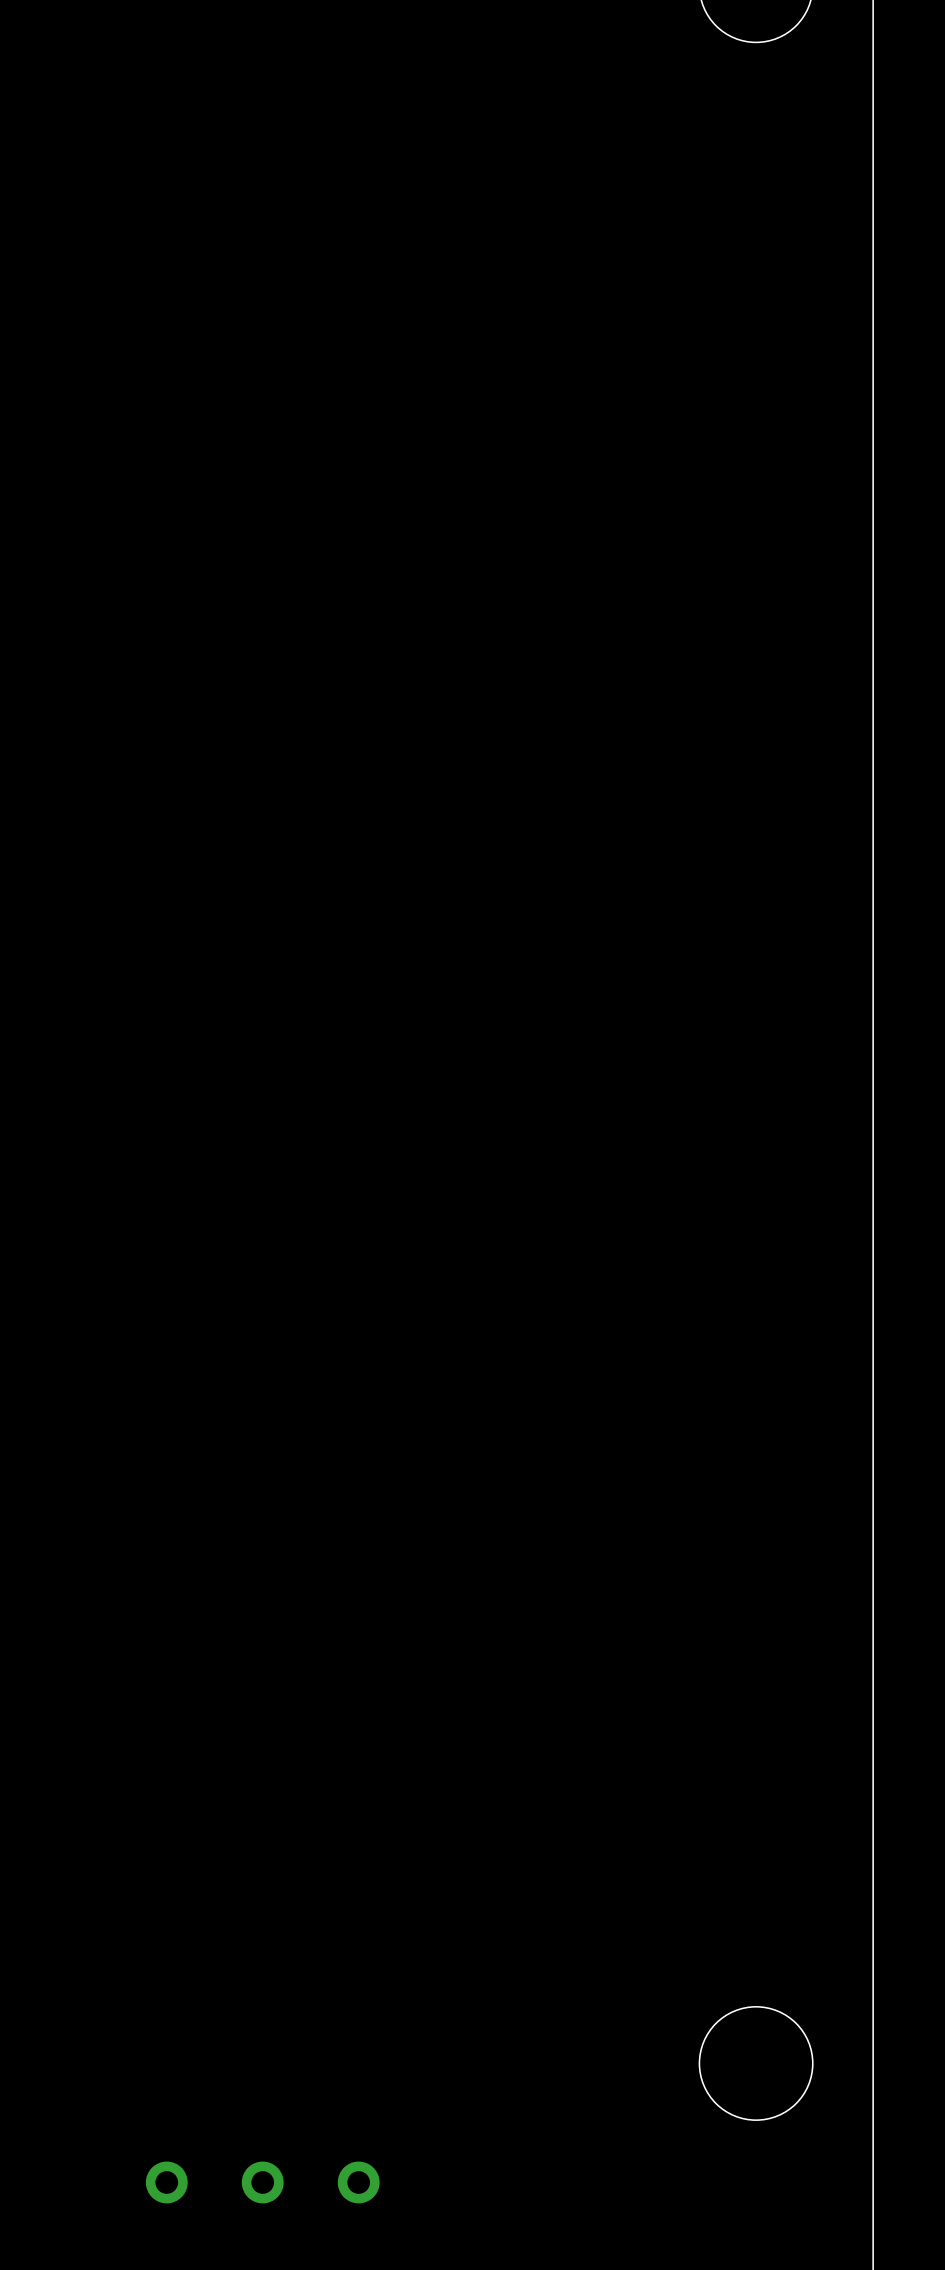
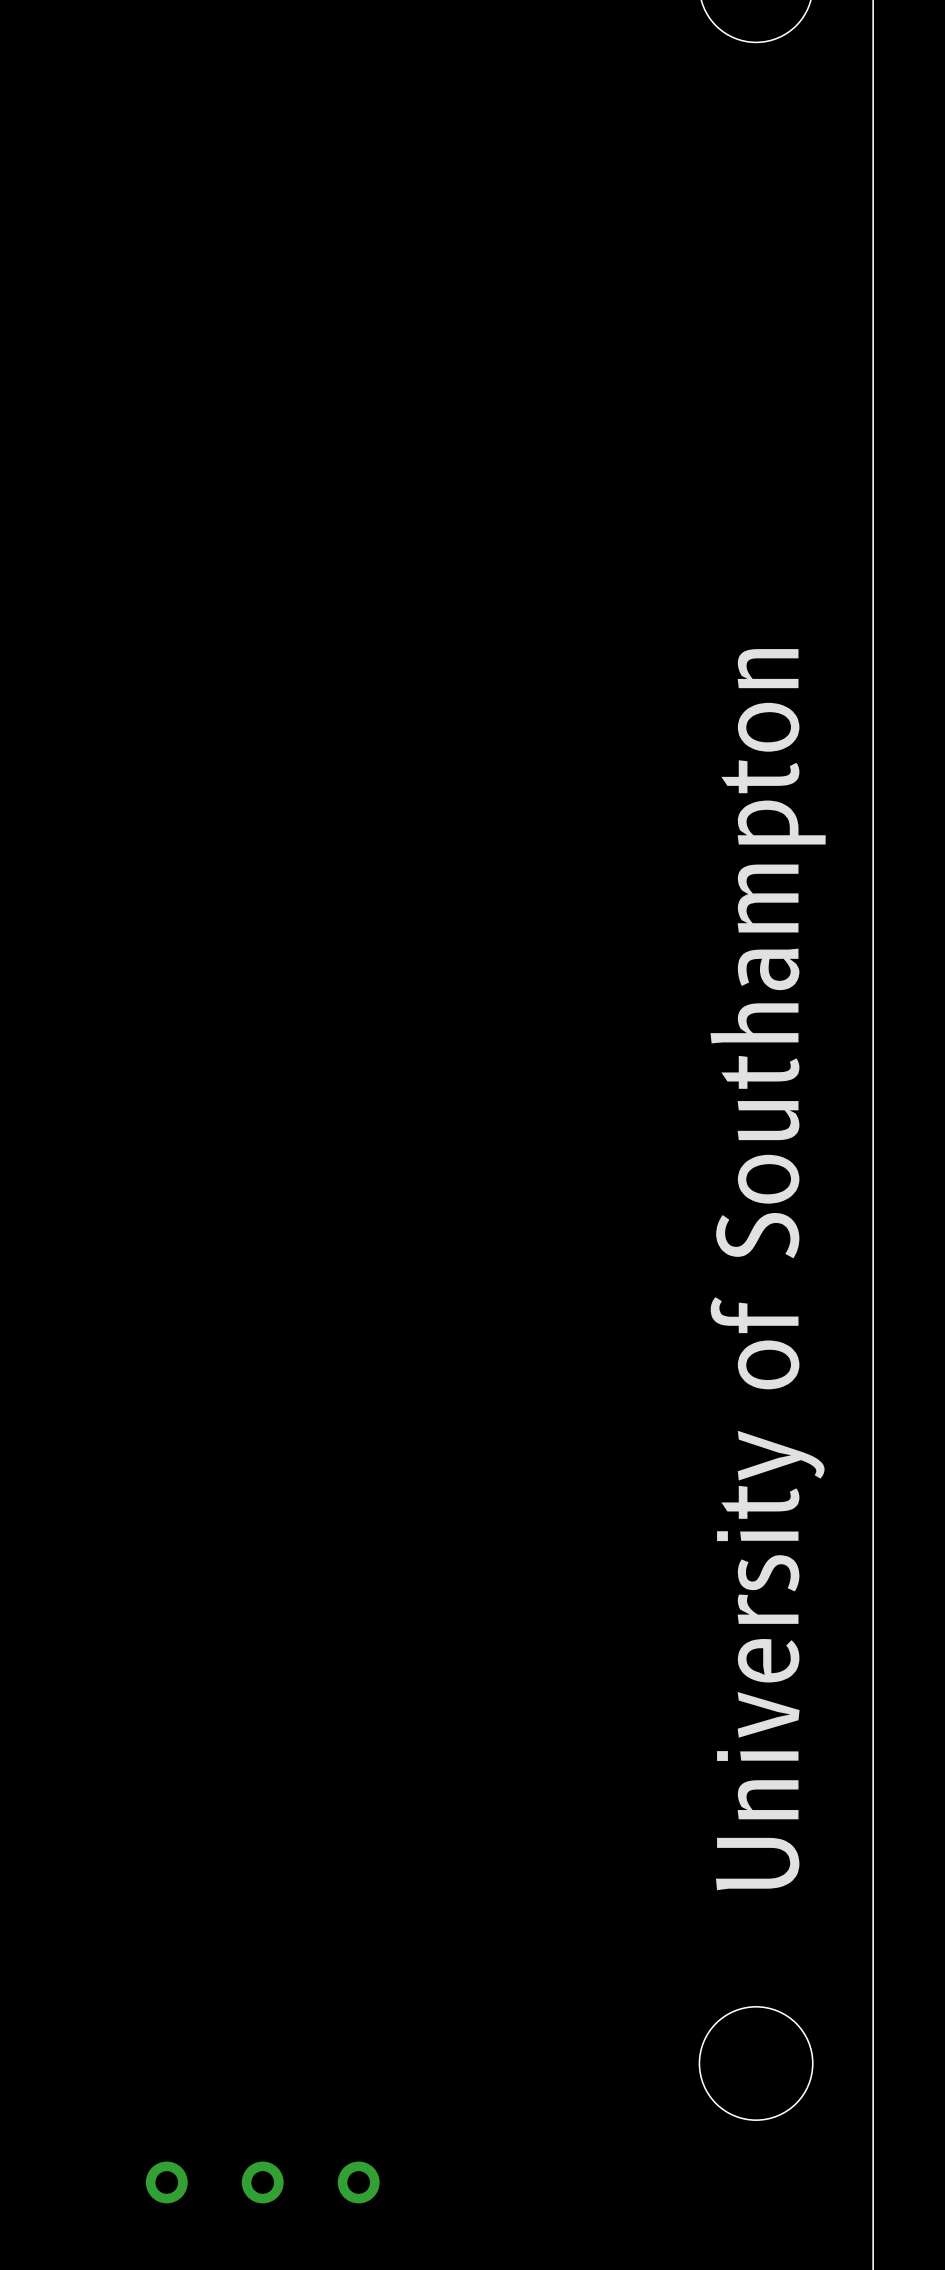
text: none -> University of Southampton (768, 1269)

